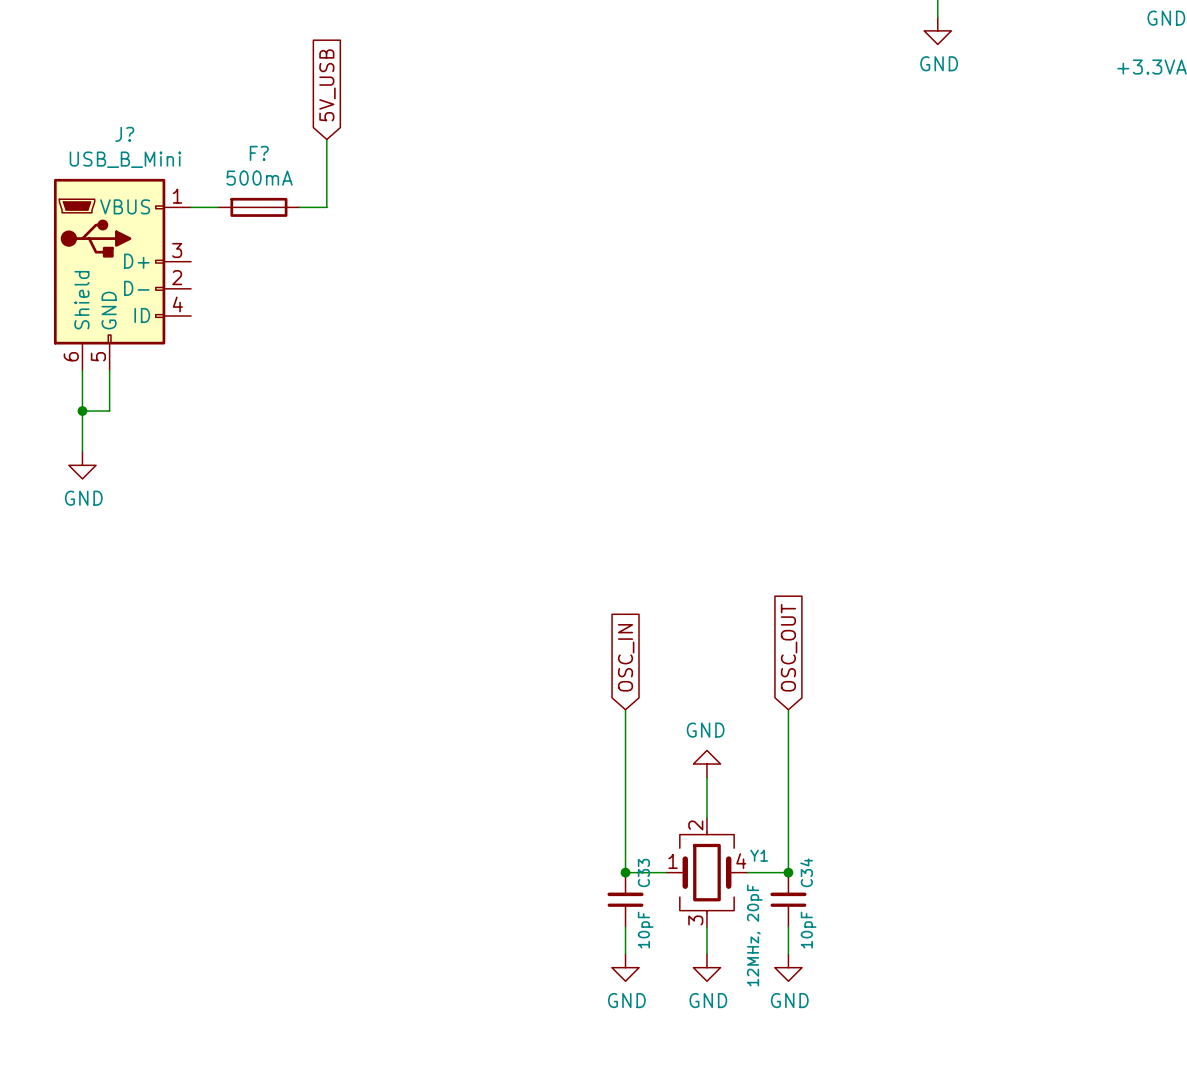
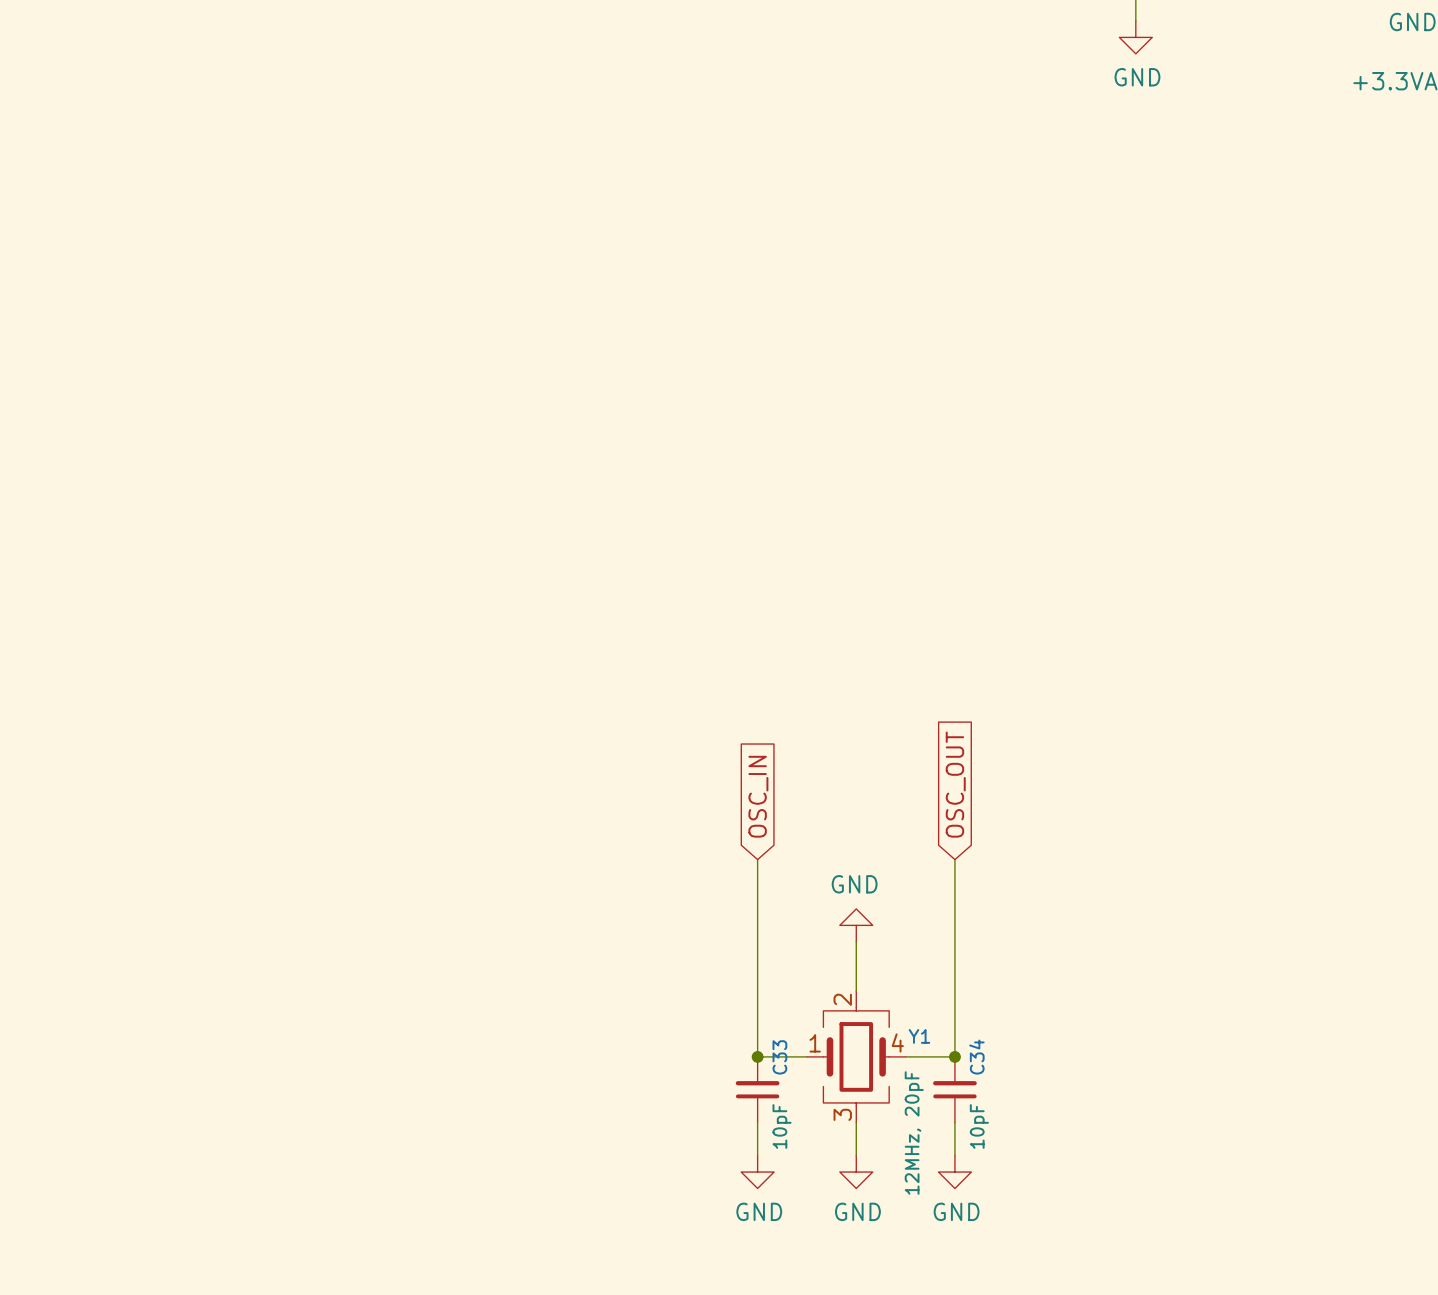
global label: 5V_USB (327, 85) -> none
wire: (326, 139) (326, 207) (299, 207) -> none
wire: (191, 207) (218, 207) -> none
F?: 500mA (258, 207) -> none
J?: USB_B_Mini (122, 274) -> none
wire: (82, 370) (82, 451) -> none
wire: (109, 370) (109, 411) (82, 411) -> none
junction: (82, 411) -> none
power symbol: GND (82, 465) -> none

